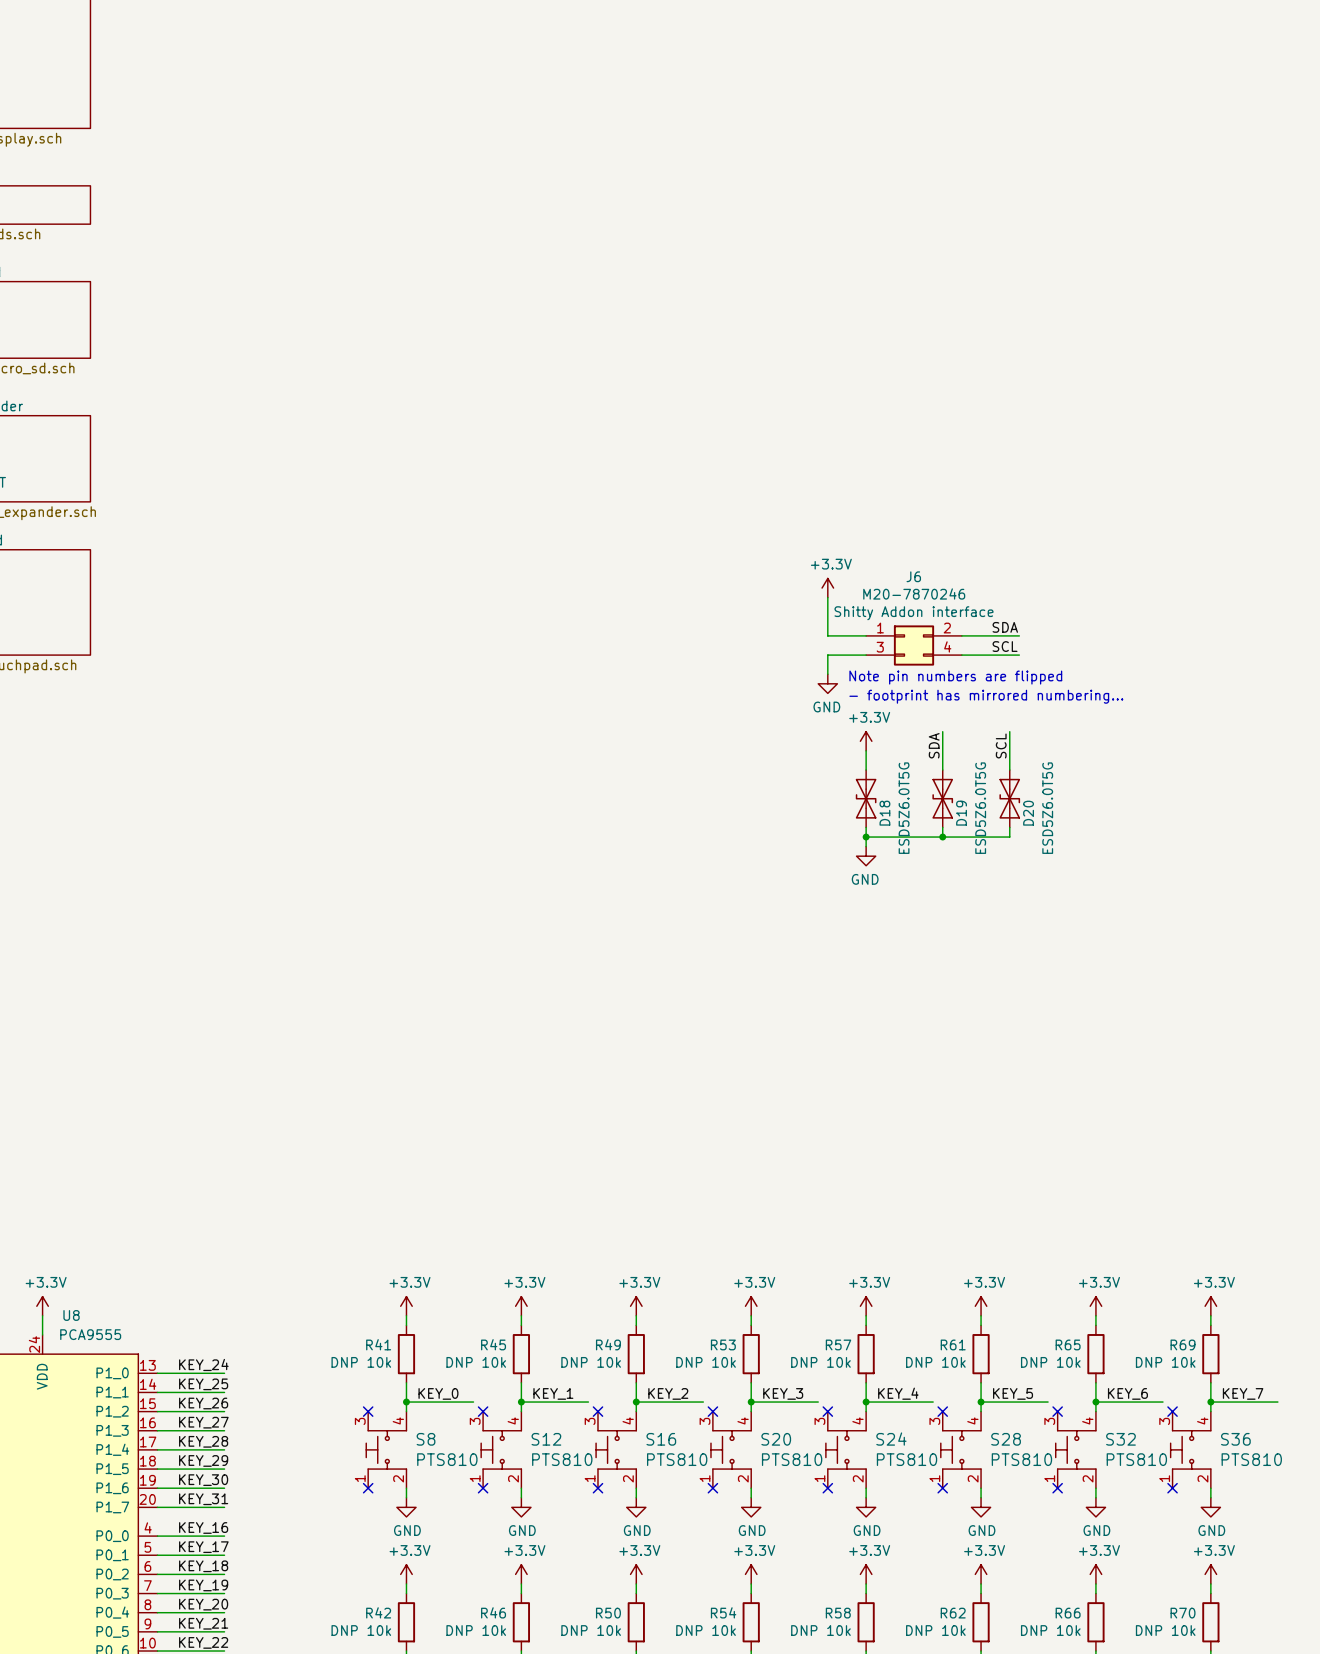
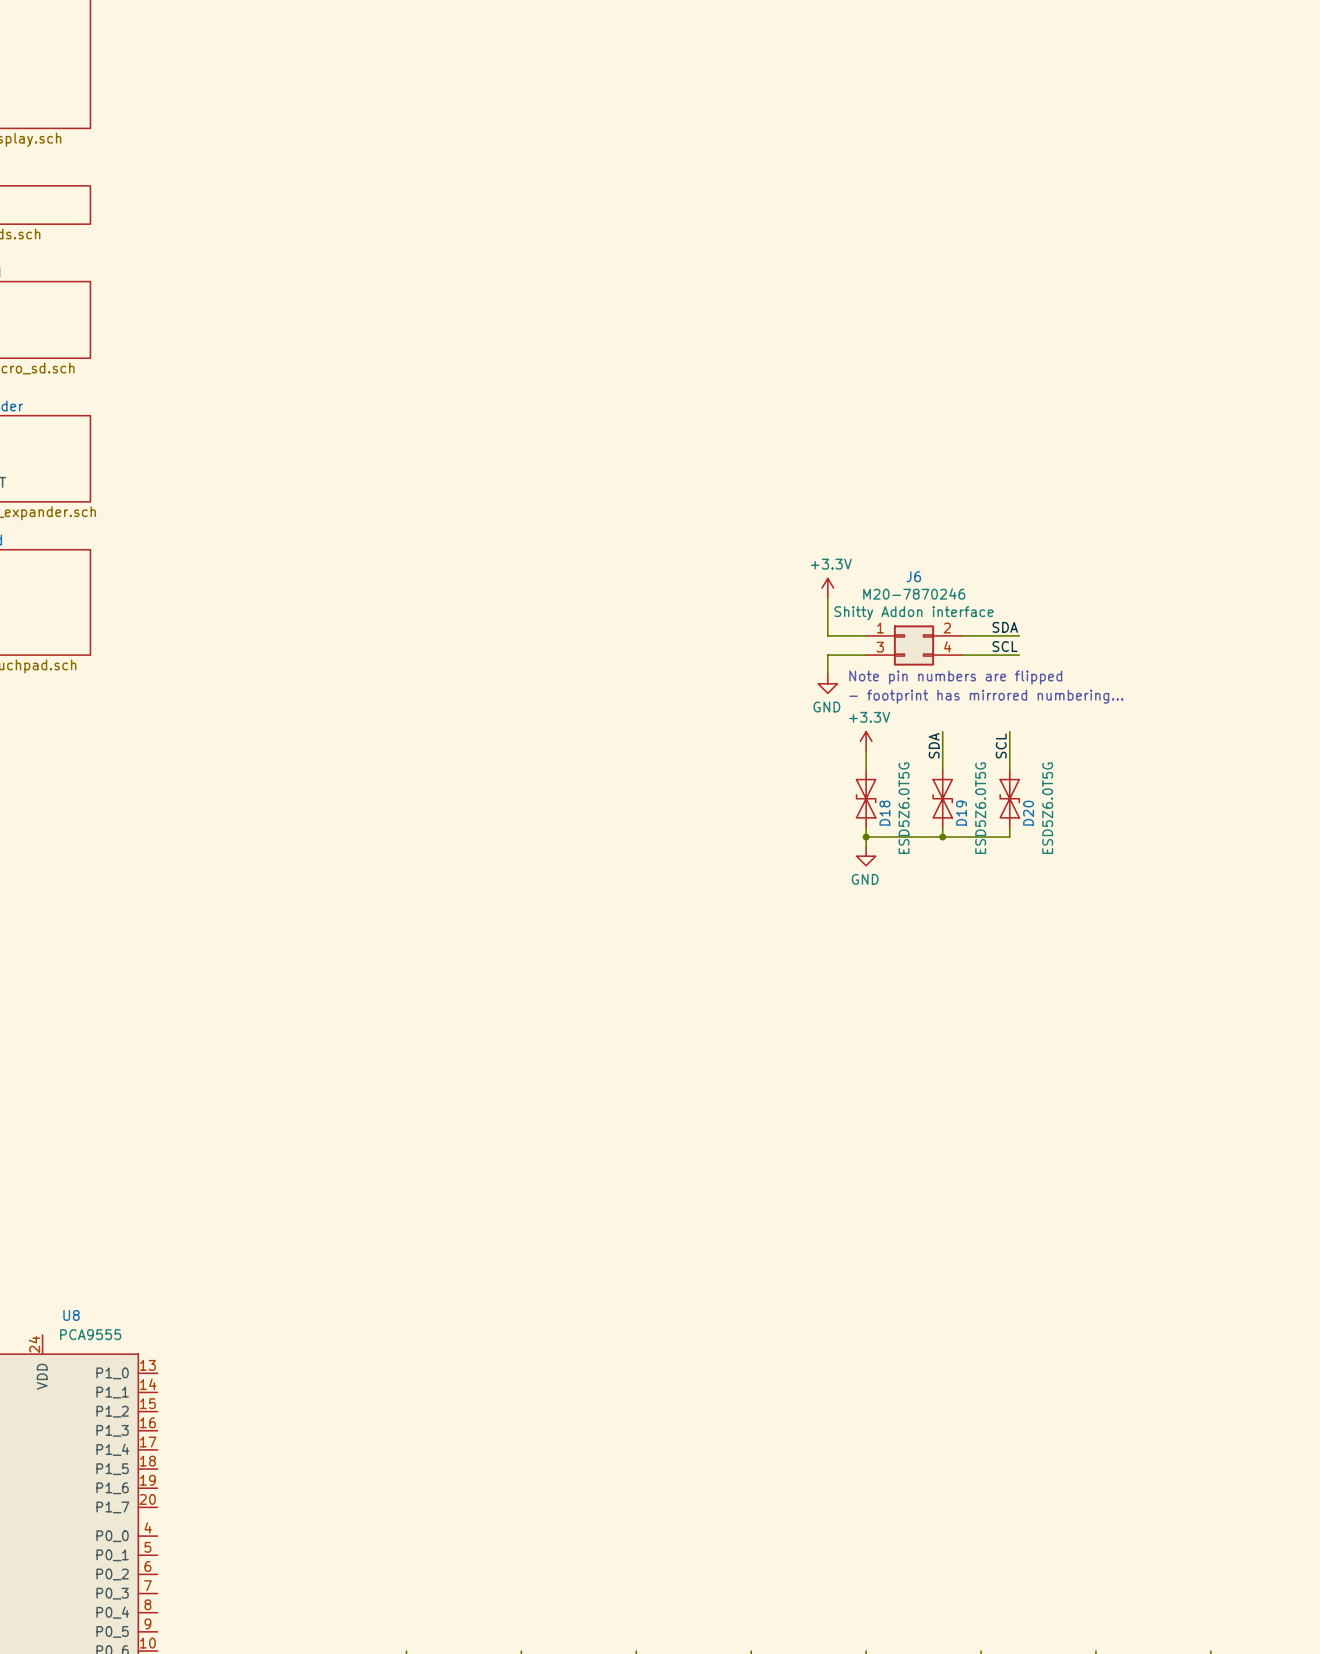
power symbol: +3.3V (42, 1306) -> none
power symbol: +3.3V (406, 1306) -> none
power symbol: +3.3V (521, 1306) -> none
power symbol: +3.3V (636, 1306) -> none
power symbol: +3.3V (751, 1306) -> none
power symbol: +3.3V (866, 1306) -> none
power symbol: +3.3V (981, 1306) -> none
power symbol: +3.3V (1095, 1306) -> none
power symbol: +3.3V (1210, 1306) -> none
wire: (42, 1315) (42, 1334) -> none
wire: (406, 1315) (406, 1325) -> none
wire: (521, 1315) (521, 1325) -> none
wire: (636, 1315) (636, 1325) -> none
wire: (751, 1315) (751, 1325) -> none
wire: (866, 1315) (866, 1325) -> none
wire: (981, 1315) (981, 1325) -> none
wire: (1095, 1315) (1095, 1325) -> none
wire: (1210, 1315) (1210, 1325) -> none
R41: DNP 10k (406, 1354) -> none
R45: DNP 10k (521, 1354) -> none
R49: DNP 10k (636, 1354) -> none
R53: DNP 10k (751, 1354) -> none
R57: DNP 10k (866, 1354) -> none
R61: DNP 10k (981, 1354) -> none
R65: DNP 10k (1095, 1354) -> none
R69: DNP 10k (1210, 1354) -> none
label: KEY_24 (203, 1364) -> none
wire: (157, 1373) (224, 1373) -> none
wire: (406, 1382) (406, 1411) -> none
wire: (521, 1382) (521, 1411) -> none
wire: (636, 1382) (636, 1411) -> none
wire: (751, 1382) (751, 1411) -> none
wire: (866, 1382) (866, 1411) -> none
wire: (981, 1382) (981, 1411) -> none
wire: (1095, 1382) (1095, 1411) -> none
wire: (1210, 1382) (1210, 1411) -> none
label: KEY_25 (203, 1384) -> none
wire: (157, 1392) (224, 1392) -> none
label: KEY_0 (438, 1393) -> none
label: KEY_1 (553, 1393) -> none
label: KEY_2 (668, 1393) -> none
label: KEY_3 (783, 1393) -> none
label: KEY_4 (898, 1393) -> none
label: KEY_5 (1013, 1393) -> none
label: KEY_6 (1127, 1393) -> none
label: KEY_7 (1243, 1393) -> none
wire: (406, 1402) (473, 1402) -> none
junction: (406, 1402) -> none
wire: (521, 1402) (588, 1402) -> none
junction: (521, 1402) -> none
wire: (636, 1402) (703, 1402) -> none
junction: (636, 1402) -> none
wire: (751, 1402) (818, 1402) -> none
junction: (751, 1402) -> none
wire: (866, 1402) (933, 1402) -> none
junction: (866, 1402) -> none
wire: (981, 1402) (1048, 1402) -> none
junction: (981, 1402) -> none
wire: (1095, 1402) (1162, 1402) -> none
junction: (1095, 1402) -> none
wire: (1210, 1402) (1277, 1402) -> none
junction: (1210, 1402) -> none
label: KEY_26 (203, 1403) -> none
wire: (157, 1411) (224, 1411) -> none
no-connect mark: (368, 1411) -> none
no-connect mark: (483, 1411) -> none
no-connect mark: (597, 1411) -> none
no-connect mark: (712, 1411) -> none
no-connect mark: (827, 1411) -> none
no-connect mark: (942, 1411) -> none
no-connect mark: (1057, 1411) -> none
no-connect mark: (1172, 1411) -> none
label: KEY_27 (203, 1422) -> none
wire: (157, 1430) (224, 1430) -> none
label: KEY_28 (203, 1441) -> none
wire: (157, 1449) (224, 1449) -> none
S8: PTS810 (386, 1449) -> none
S12: PTS810 (501, 1449) -> none
S16: PTS810 (616, 1449) -> none
S20: PTS810 (731, 1449) -> none
S24: PTS810 (846, 1449) -> none
S28: PTS810 (960, 1449) -> none
S32: PTS810 (1075, 1449) -> none
S36: PTS810 (1190, 1449) -> none
label: KEY_29 (203, 1460) -> none
wire: (157, 1469) (224, 1469) -> none
label: KEY_30 (203, 1480) -> none
wire: (157, 1488) (224, 1488) -> none
no-connect mark: (368, 1488) -> none
wire: (406, 1488) (406, 1497) -> none
no-connect mark: (483, 1488) -> none
wire: (521, 1488) (521, 1497) -> none
no-connect mark: (597, 1488) -> none
wire: (636, 1488) (636, 1497) -> none
no-connect mark: (712, 1488) -> none
wire: (751, 1488) (751, 1497) -> none
no-connect mark: (827, 1488) -> none
wire: (866, 1488) (866, 1497) -> none
no-connect mark: (942, 1488) -> none
wire: (981, 1488) (981, 1497) -> none
no-connect mark: (1057, 1488) -> none
wire: (1095, 1488) (1095, 1497) -> none
no-connect mark: (1172, 1488) -> none
wire: (1210, 1488) (1210, 1497) -> none
label: KEY_31 (203, 1499) -> none
wire: (157, 1507) (224, 1507) -> none
power symbol: GND (406, 1507) -> none
power symbol: GND (521, 1507) -> none
power symbol: GND (636, 1507) -> none
power symbol: GND (751, 1507) -> none
power symbol: GND (866, 1507) -> none
power symbol: GND (981, 1507) -> none
power symbol: GND (1095, 1507) -> none
power symbol: GND (1210, 1507) -> none
label: KEY_16 (203, 1528) -> none
wire: (157, 1536) (224, 1536) -> none
label: KEY_17 (203, 1547) -> none
wire: (157, 1555) (224, 1555) -> none
label: KEY_18 (203, 1566) -> none
wire: (157, 1574) (224, 1574) -> none
power symbol: +3.3V (406, 1574) -> none
power symbol: +3.3V (521, 1574) -> none
power symbol: +3.3V (636, 1574) -> none
power symbol: +3.3V (751, 1574) -> none
power symbol: +3.3V (866, 1574) -> none
power symbol: +3.3V (981, 1574) -> none
power symbol: +3.3V (1095, 1574) -> none
power symbol: +3.3V (1210, 1574) -> none
wire: (406, 1583) (406, 1593) -> none
wire: (521, 1583) (521, 1593) -> none
wire: (636, 1583) (636, 1593) -> none
wire: (751, 1583) (751, 1593) -> none
wire: (866, 1583) (866, 1593) -> none
wire: (981, 1583) (981, 1593) -> none
wire: (1095, 1583) (1095, 1593) -> none
wire: (1210, 1583) (1210, 1593) -> none
label: KEY_19 (203, 1585) -> none
wire: (157, 1593) (224, 1593) -> none
label: KEY_20 (203, 1604) -> none
wire: (157, 1612) (224, 1612) -> none
R42: DNP 10k (406, 1622) -> none
R46: DNP 10k (521, 1622) -> none
R50: DNP 10k (636, 1622) -> none
R54: DNP 10k (751, 1622) -> none
R58: DNP 10k (866, 1622) -> none
R62: DNP 10k (981, 1622) -> none
R66: DNP 10k (1095, 1622) -> none
R70: DNP 10k (1210, 1622) -> none
label: KEY_21 (203, 1623) -> none
wire: (157, 1631) (224, 1631) -> none
label: KEY_22 (203, 1642) -> none
wire: (157, 1651) (224, 1651) -> none

